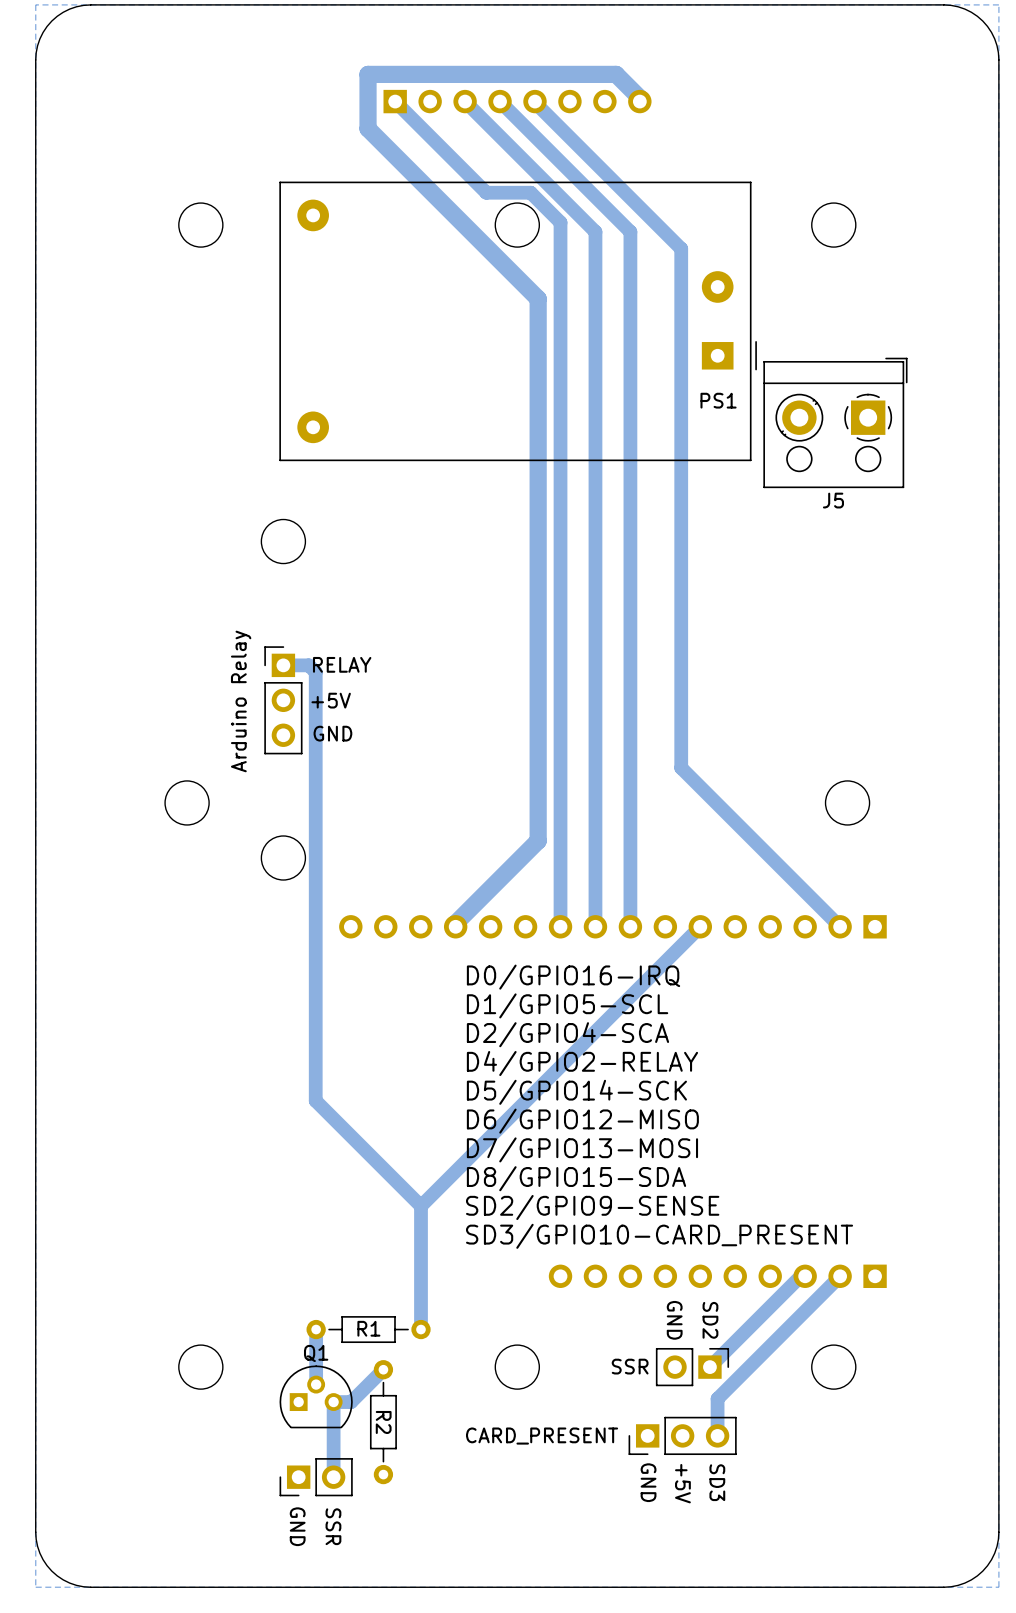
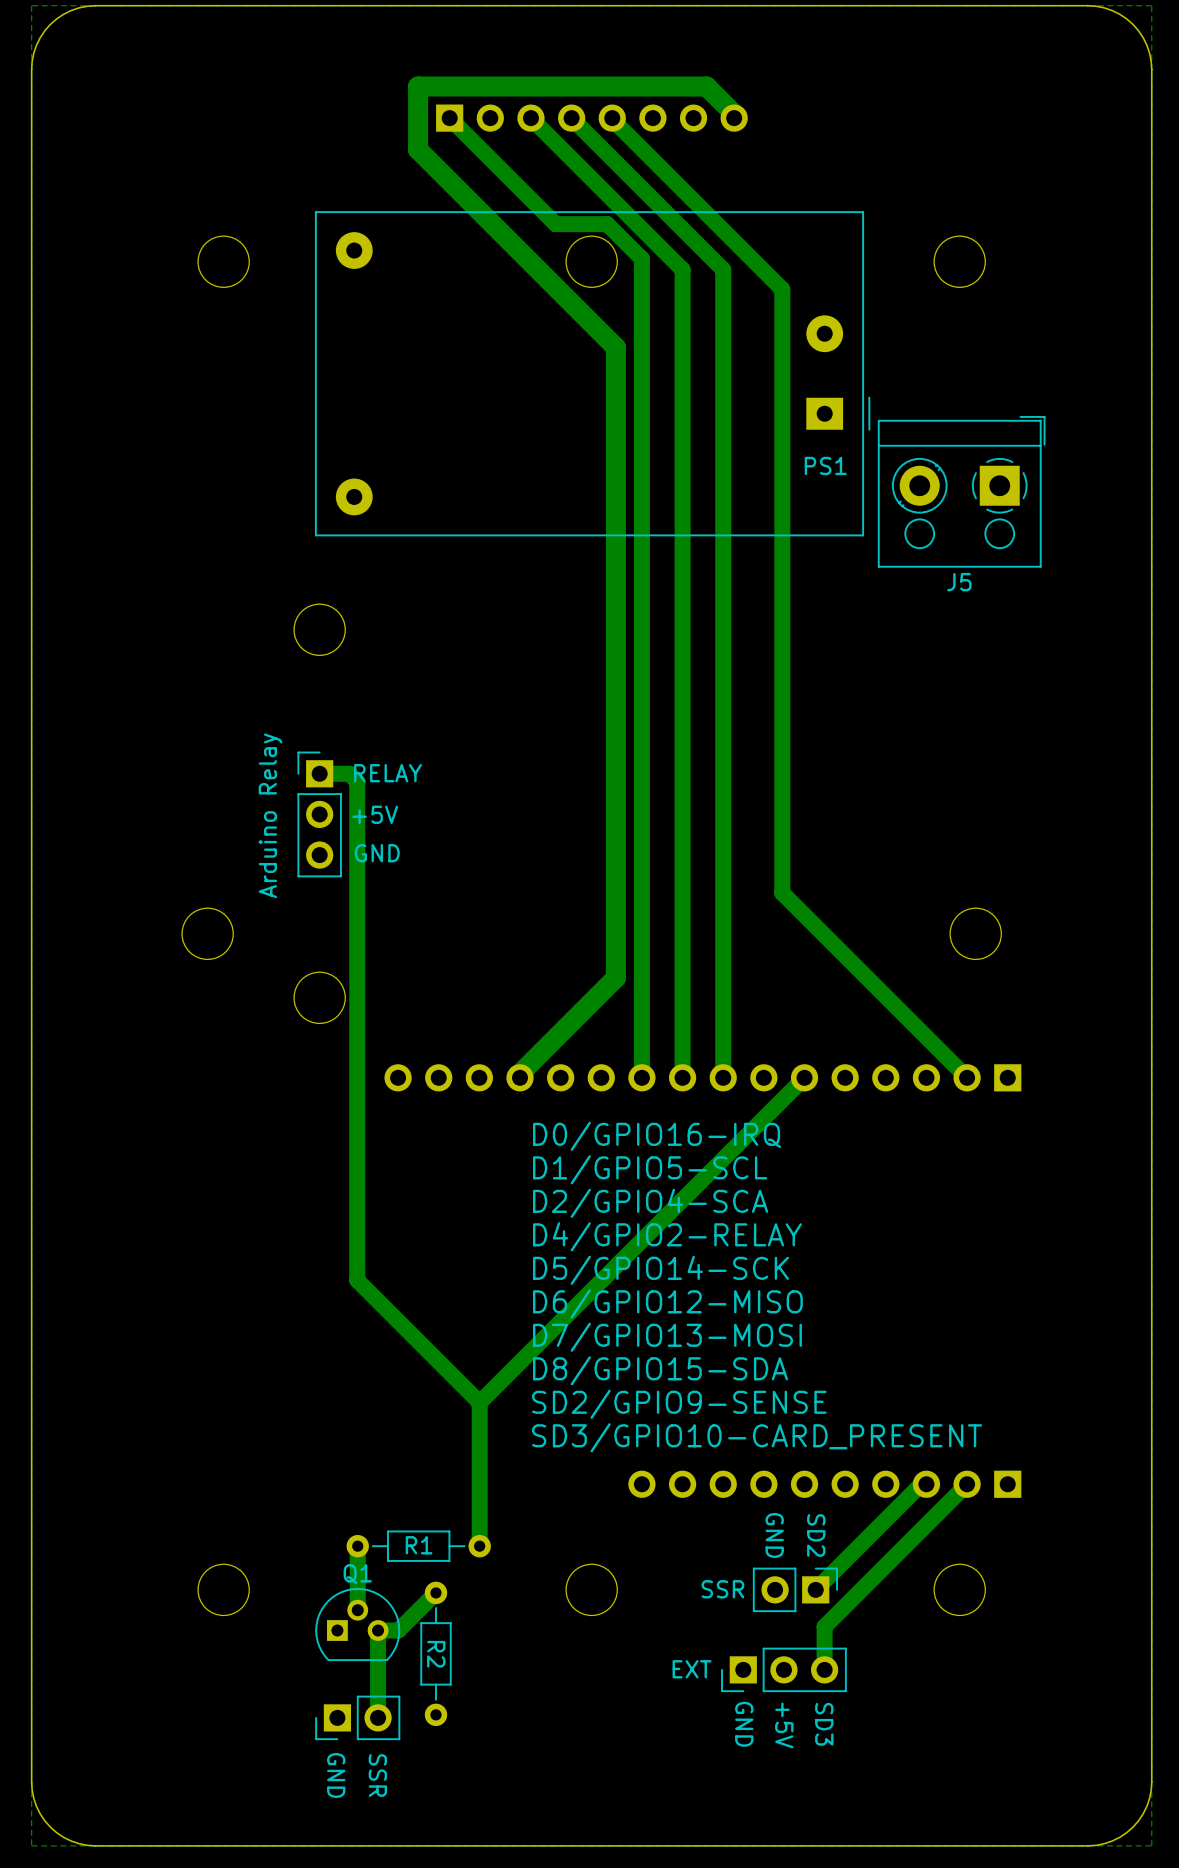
text: none -> EXT (692, 1669)
text: CARD_PRESENT (542, 1436) -> none

